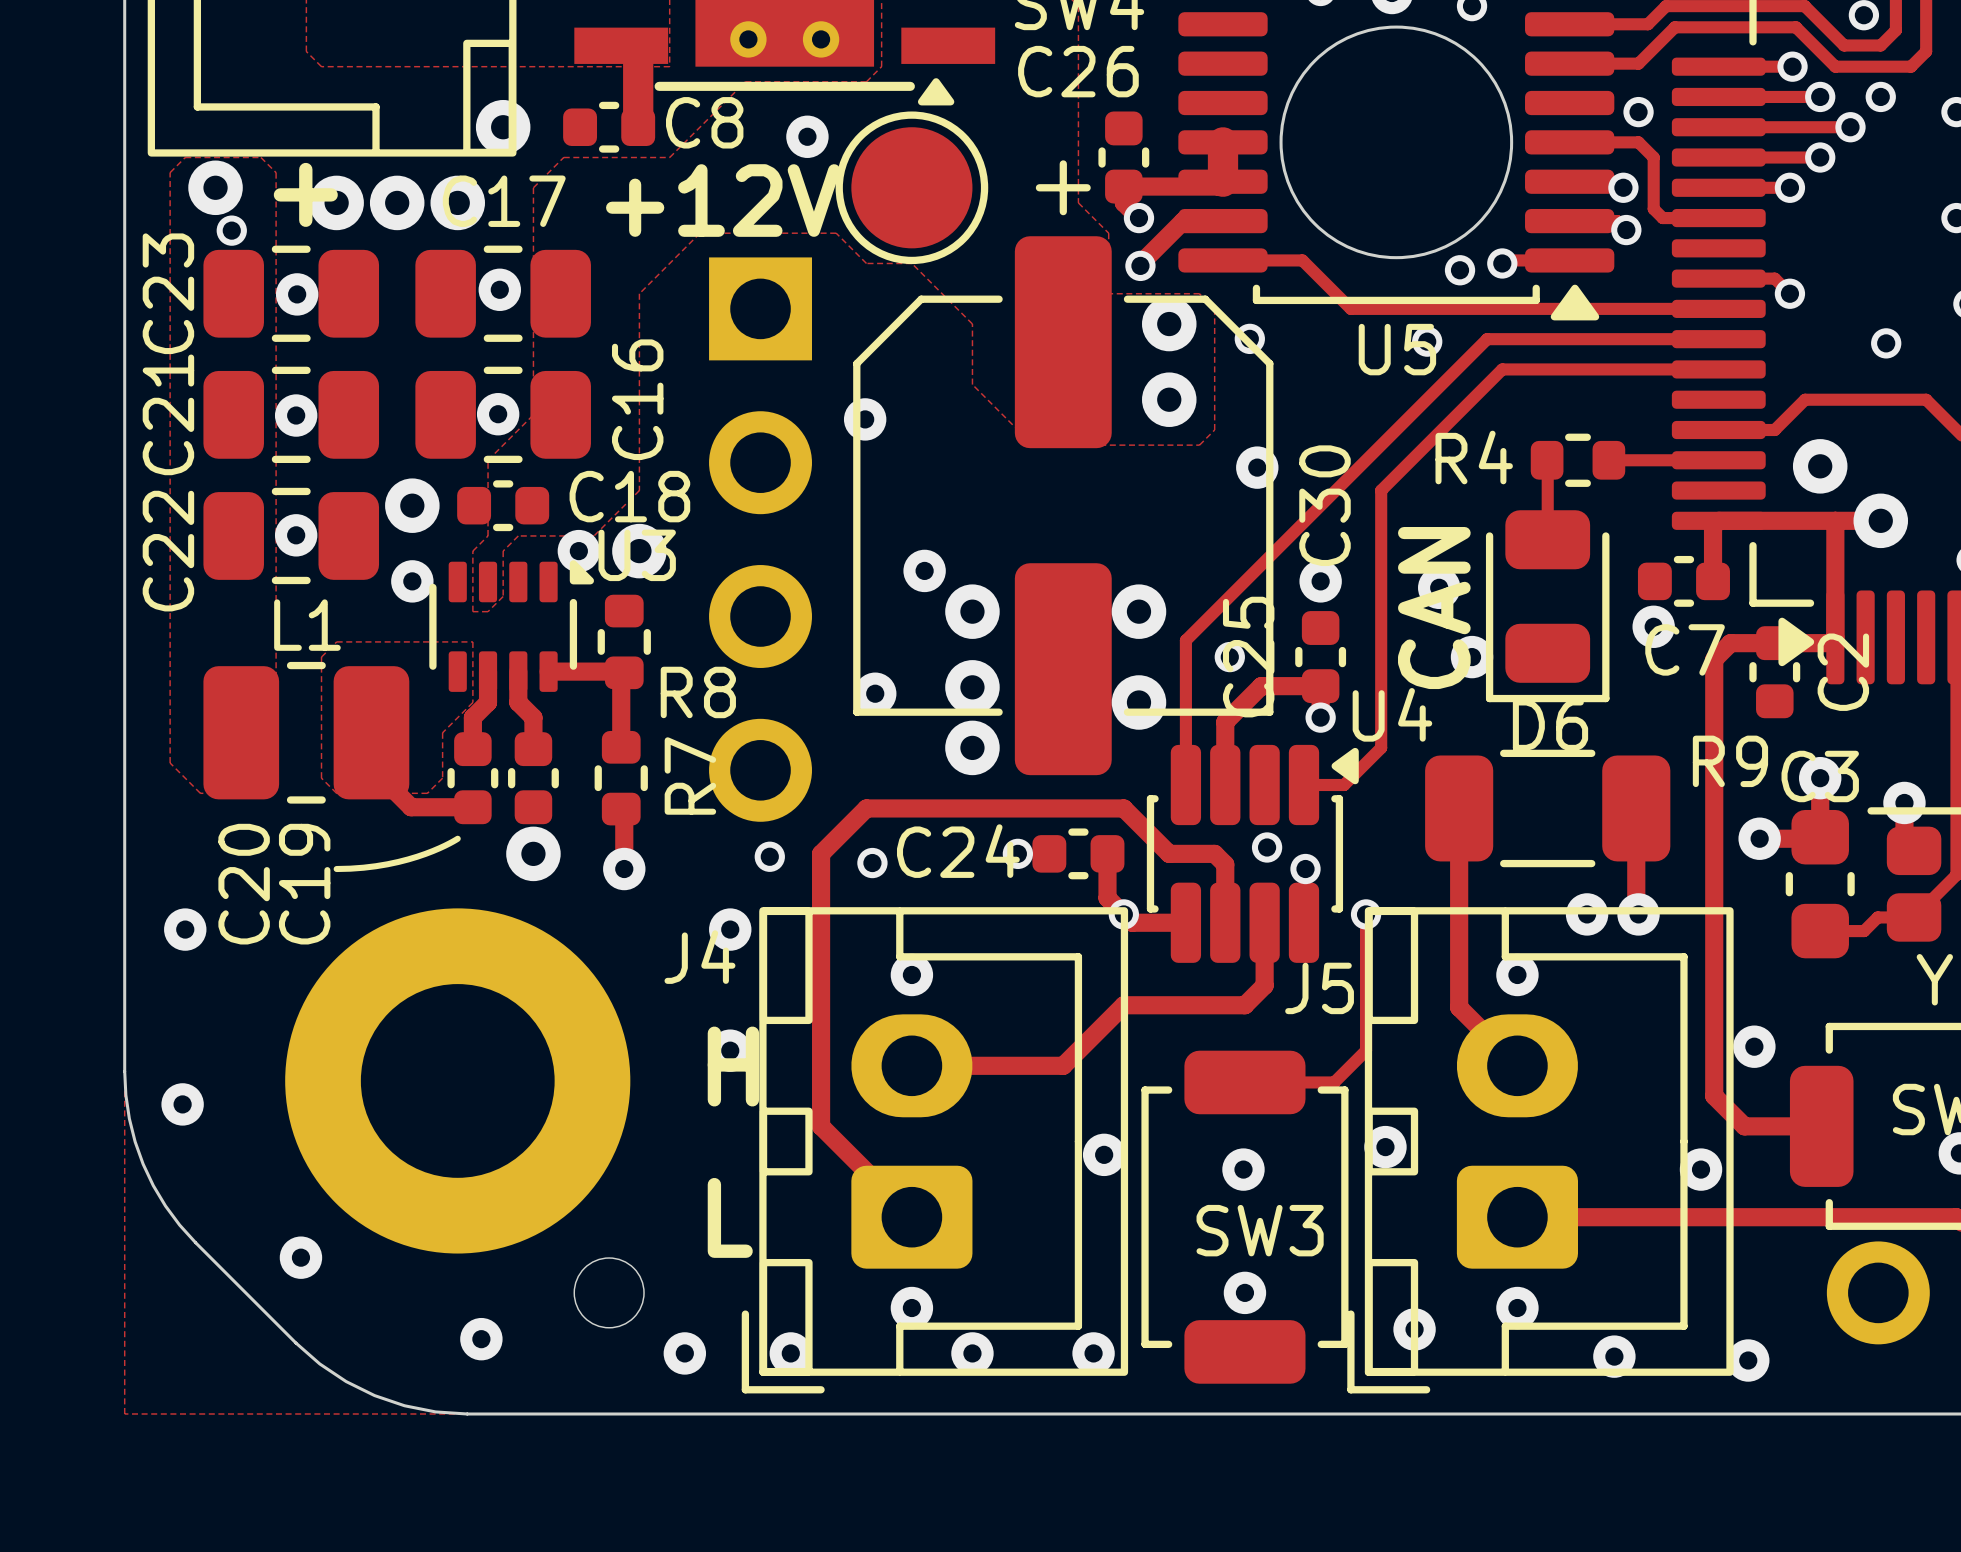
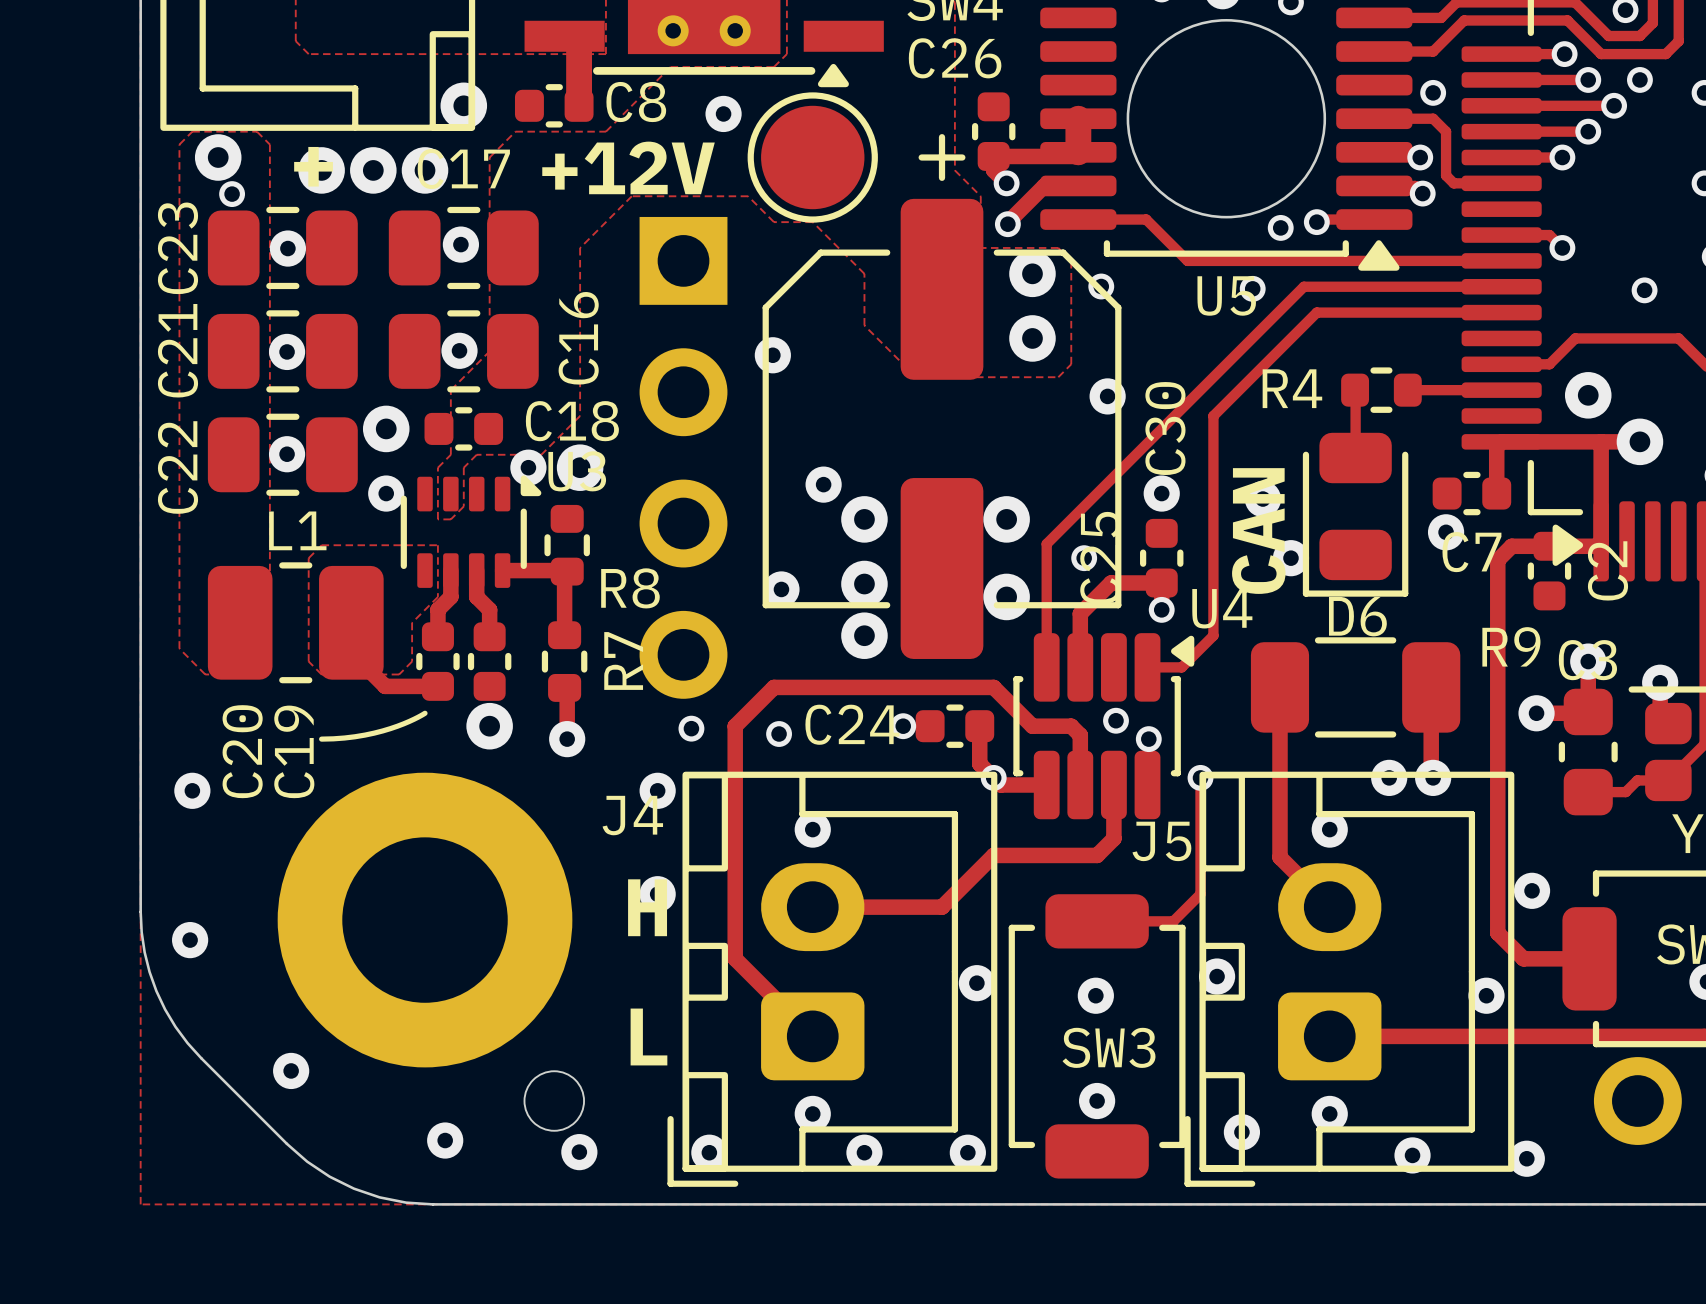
via position: (684, 1353) -> (579, 1152)

